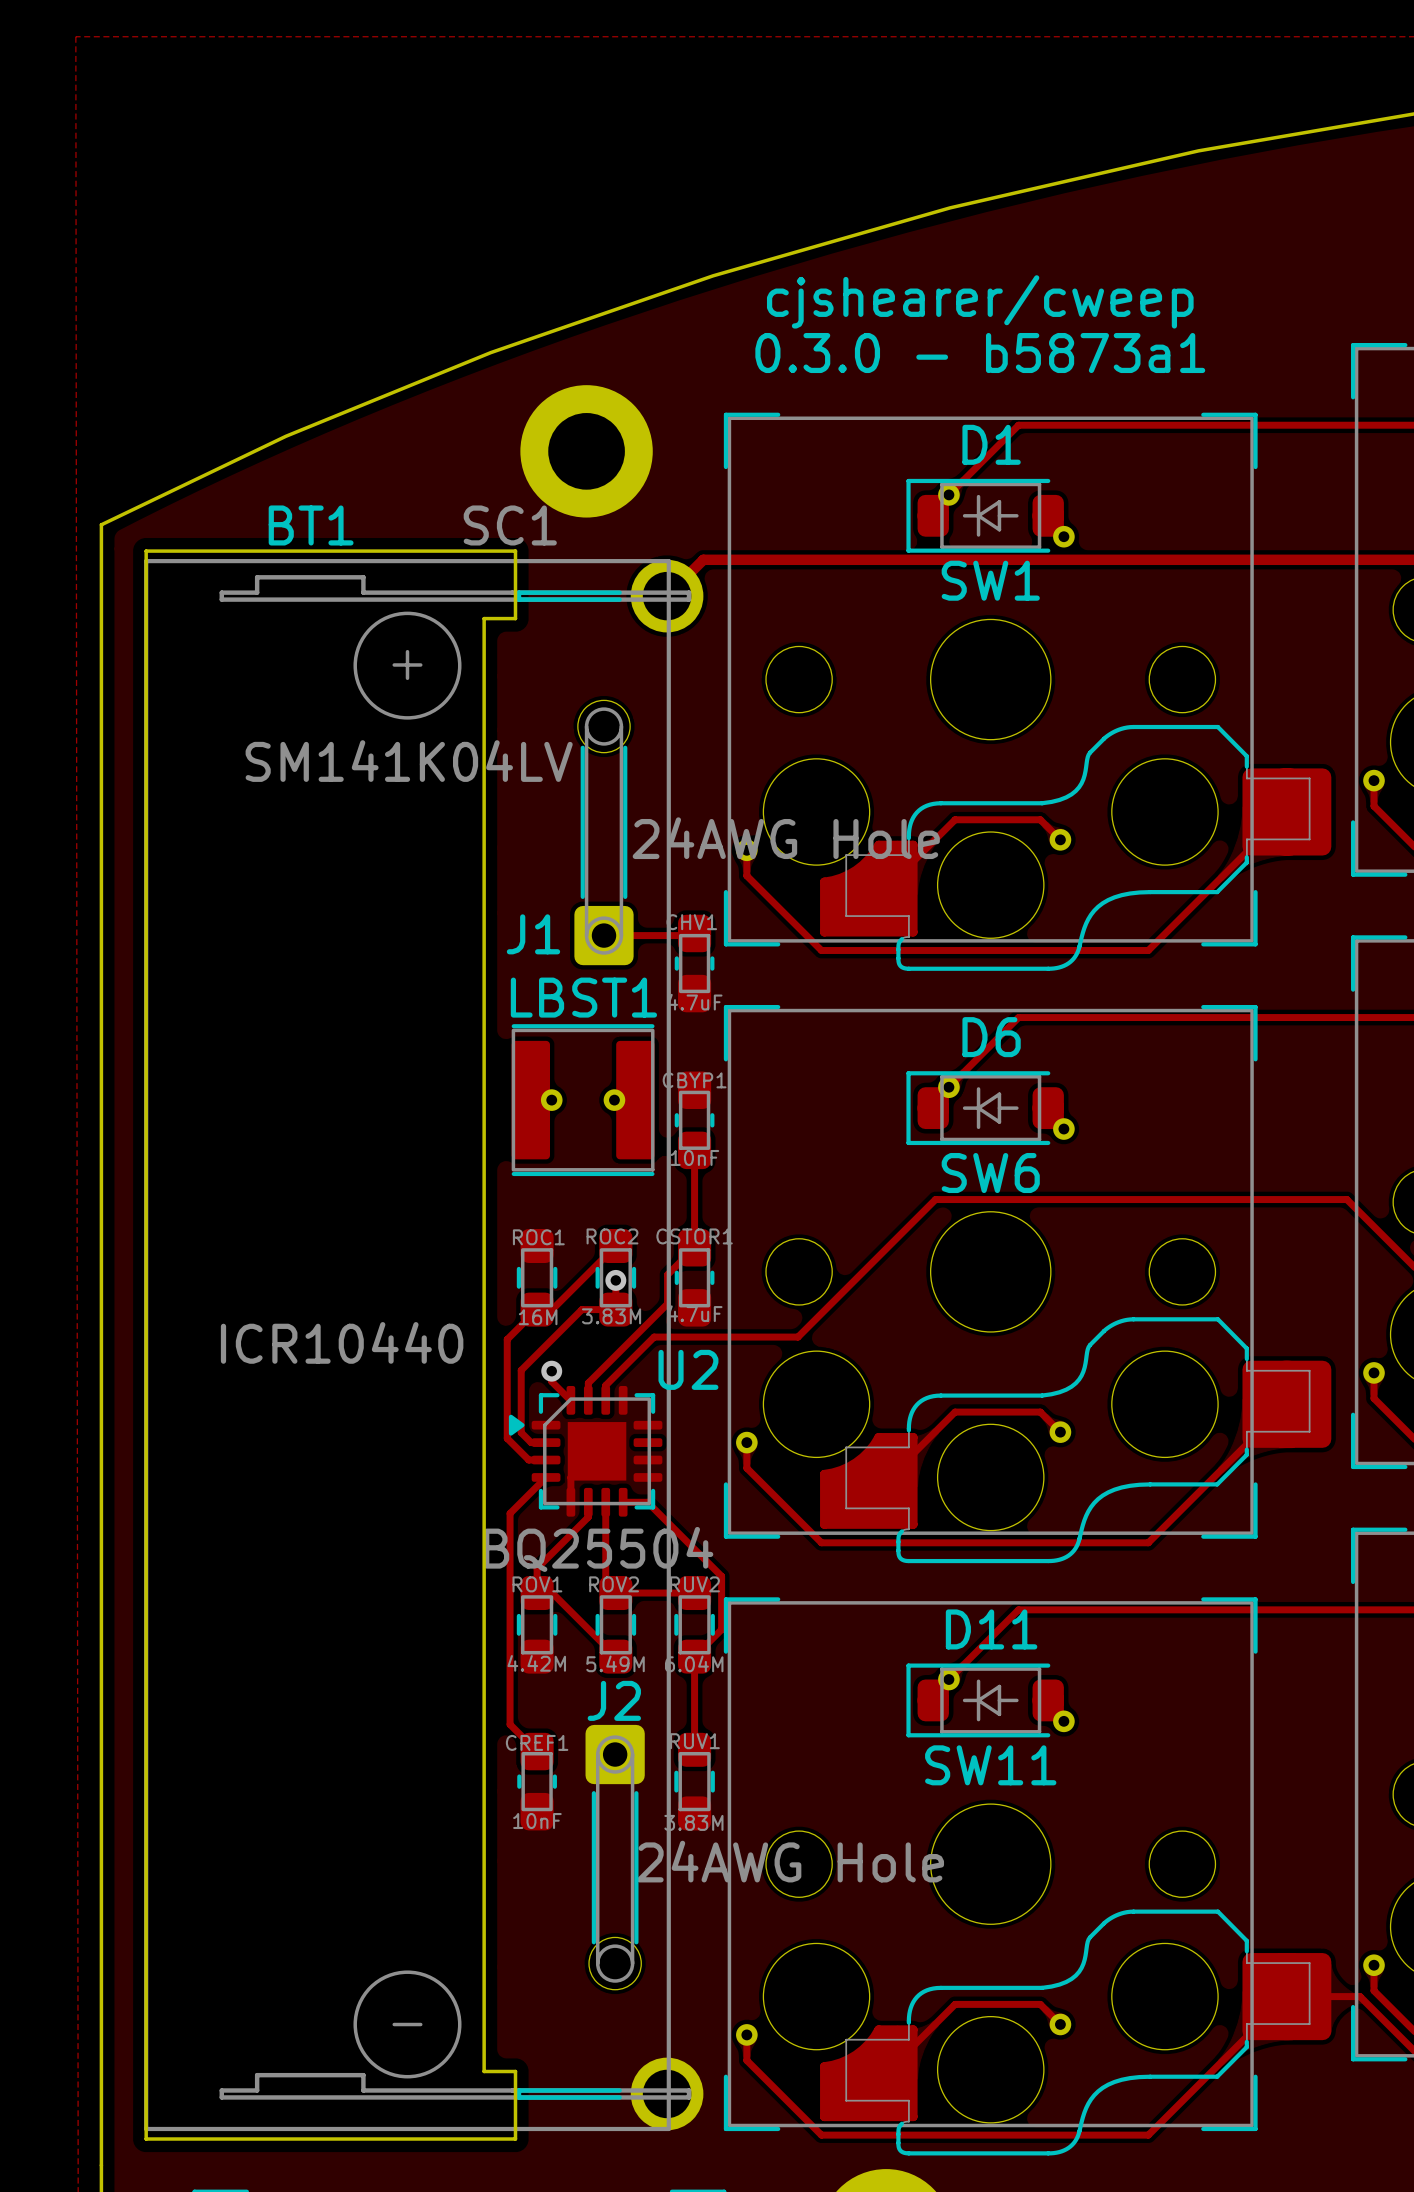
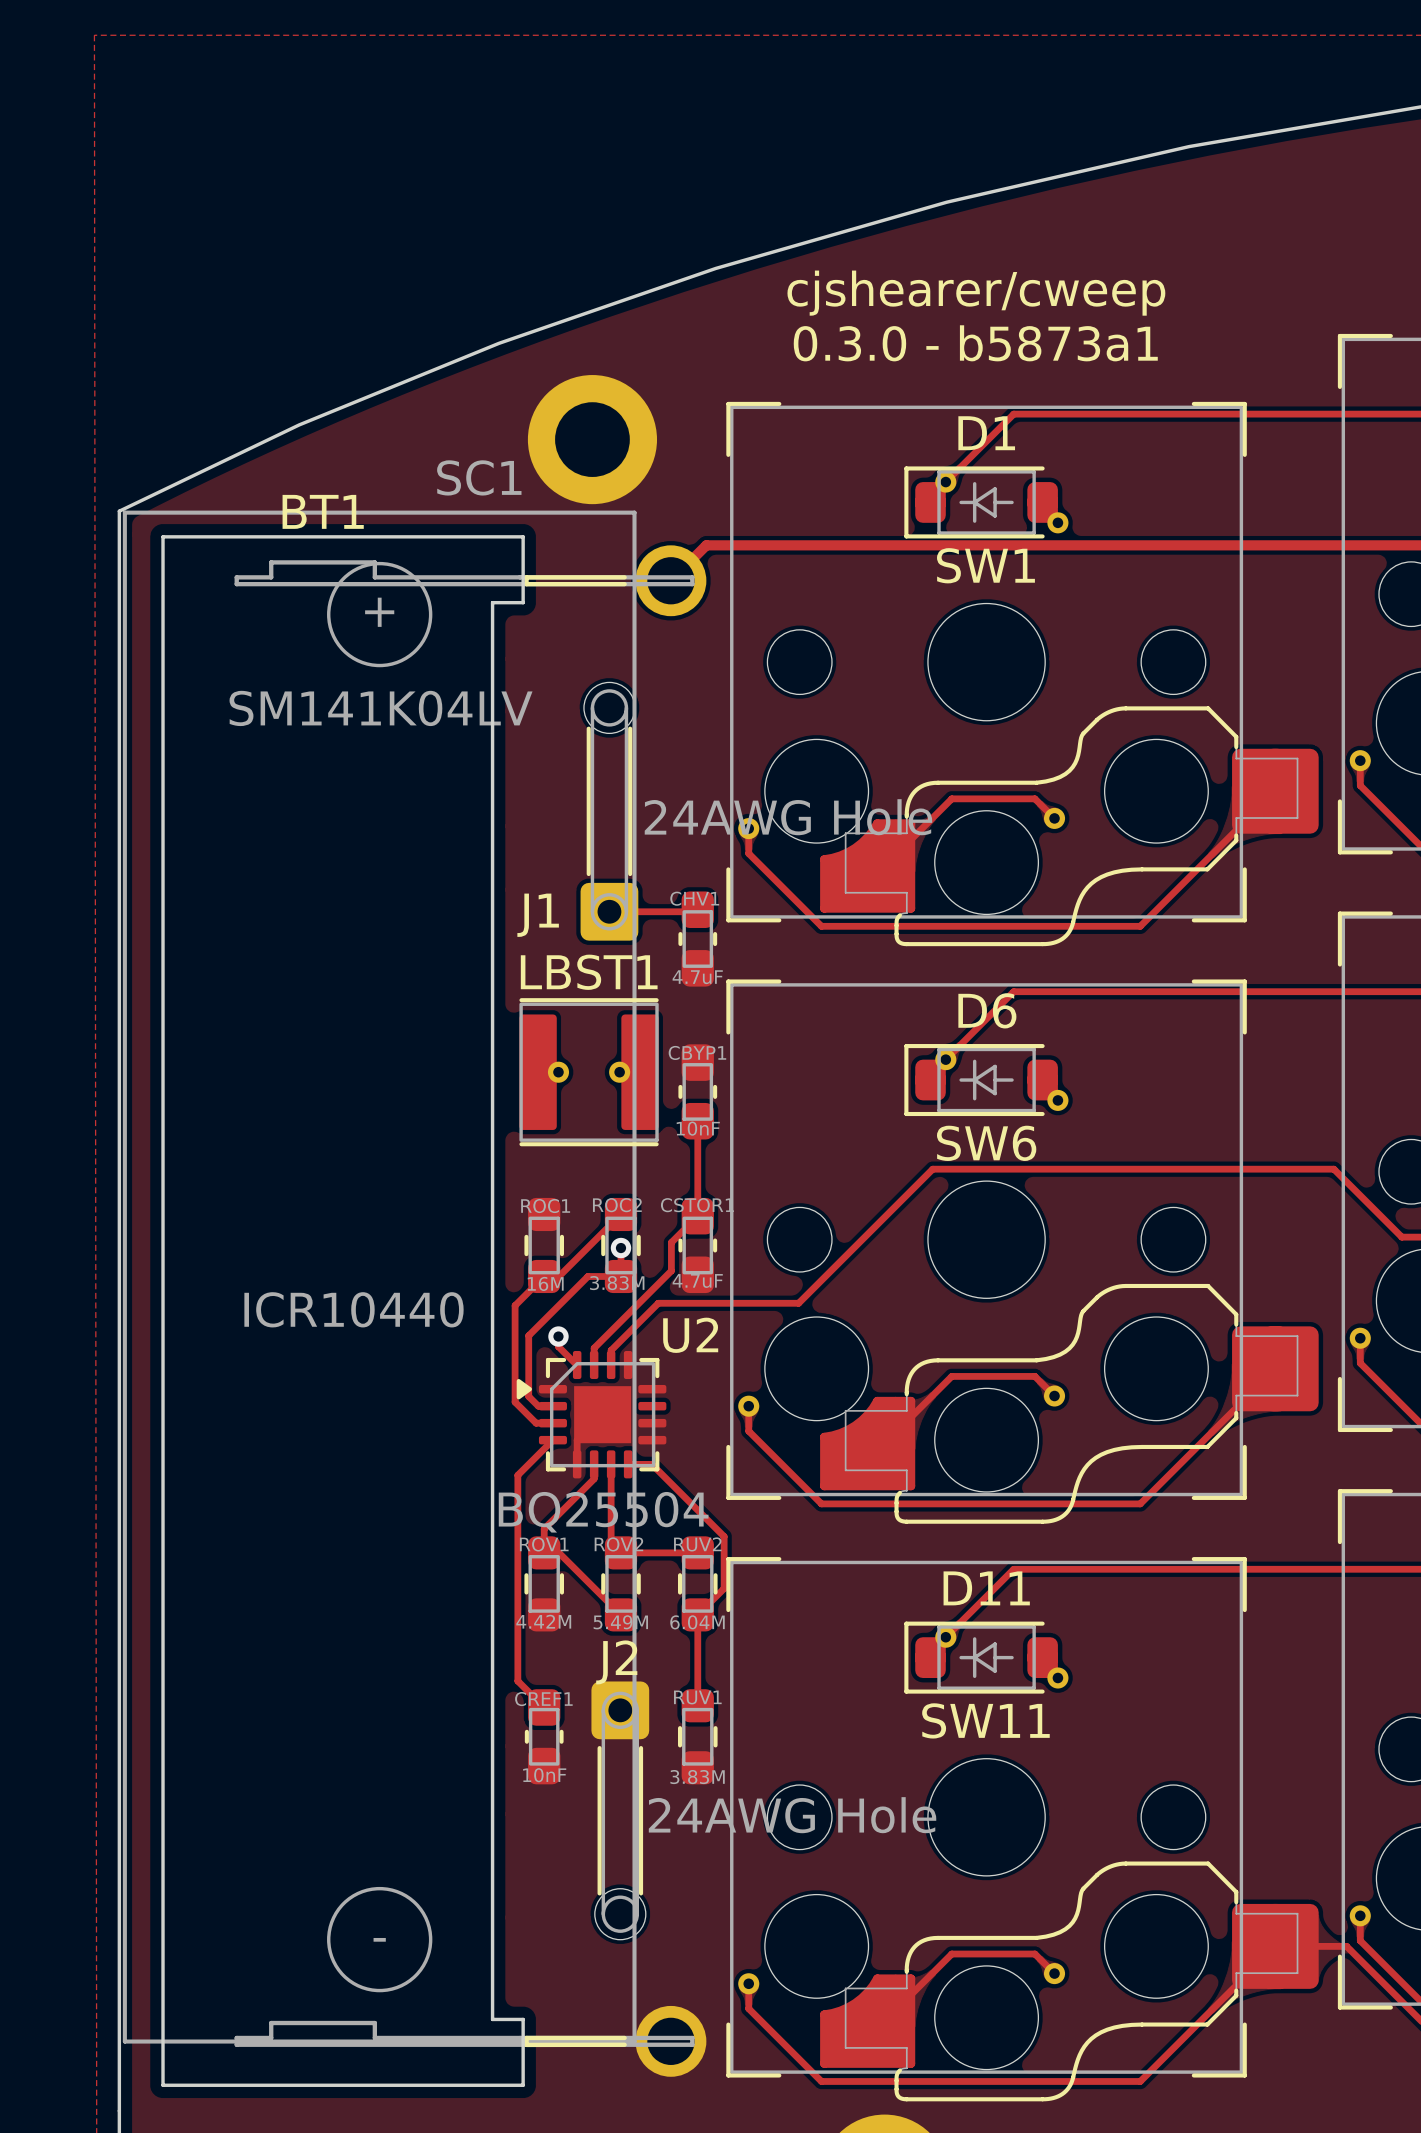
SC1 position: (407, 1345) -> (379, 1277)

